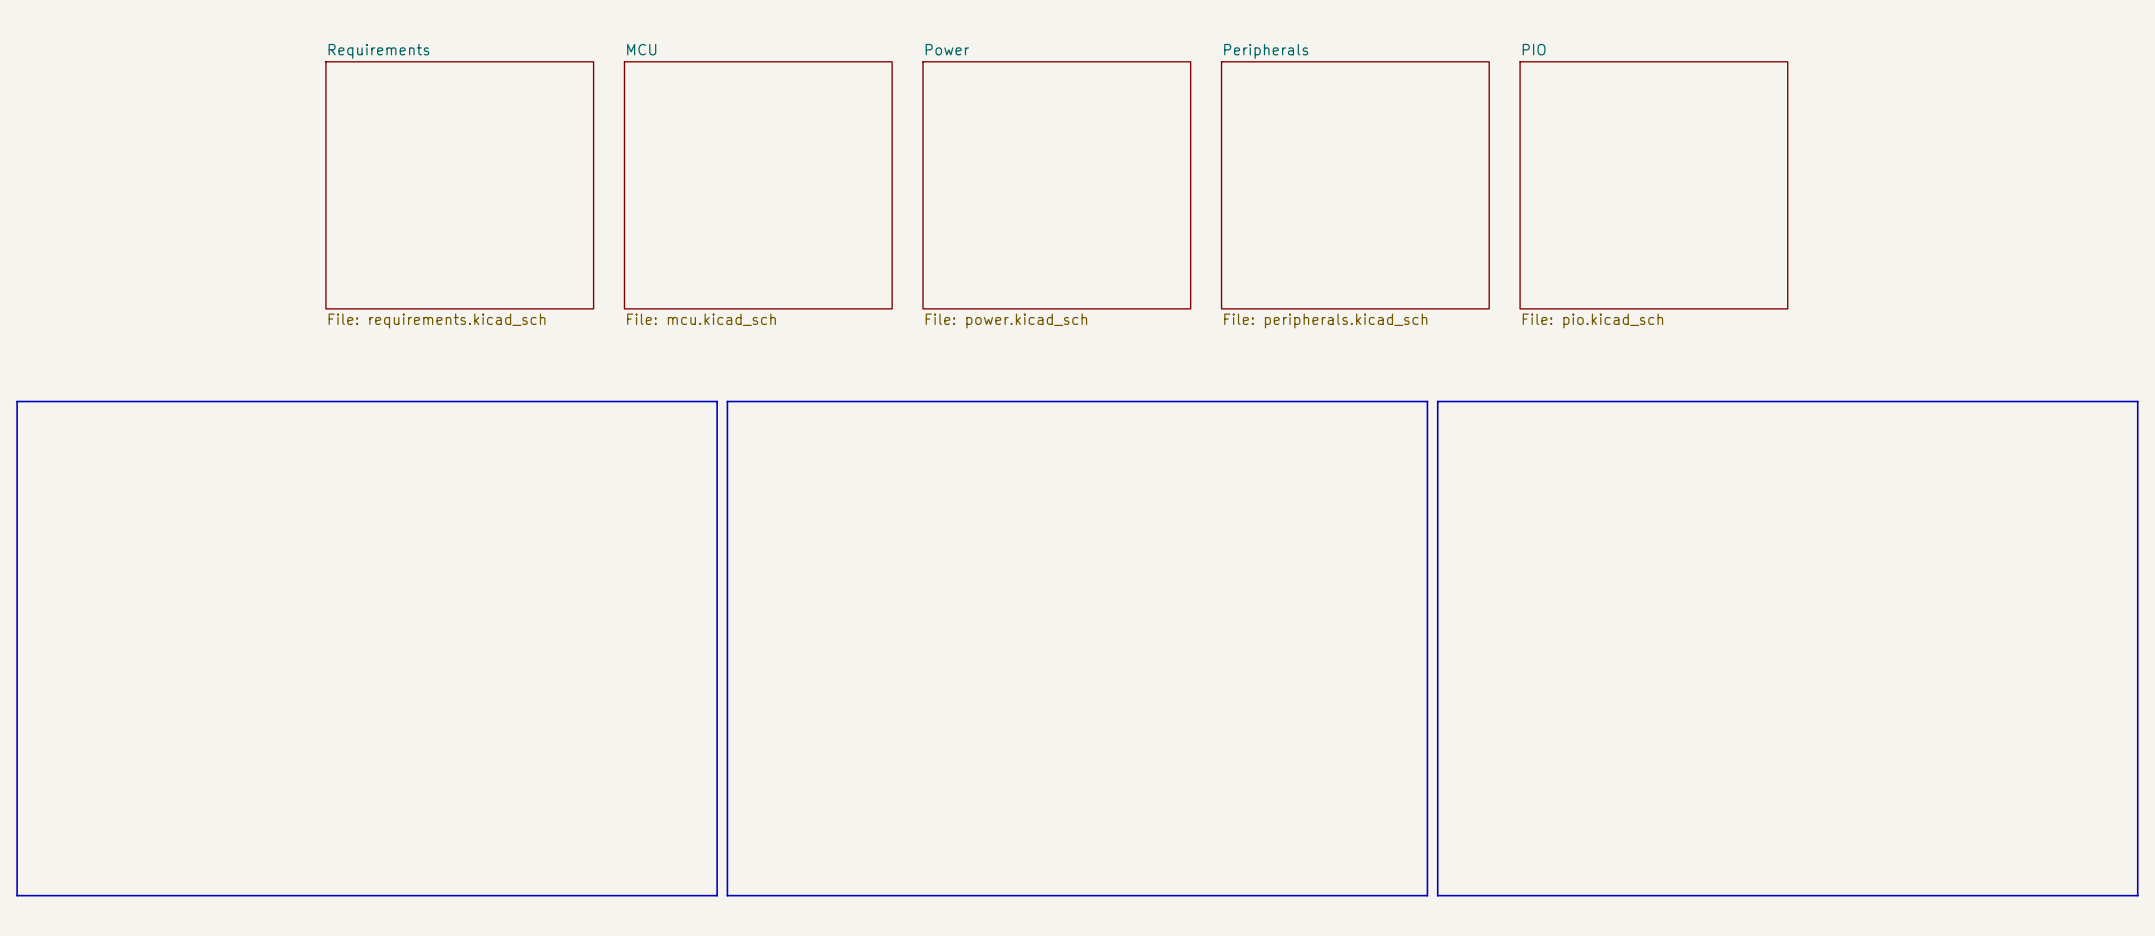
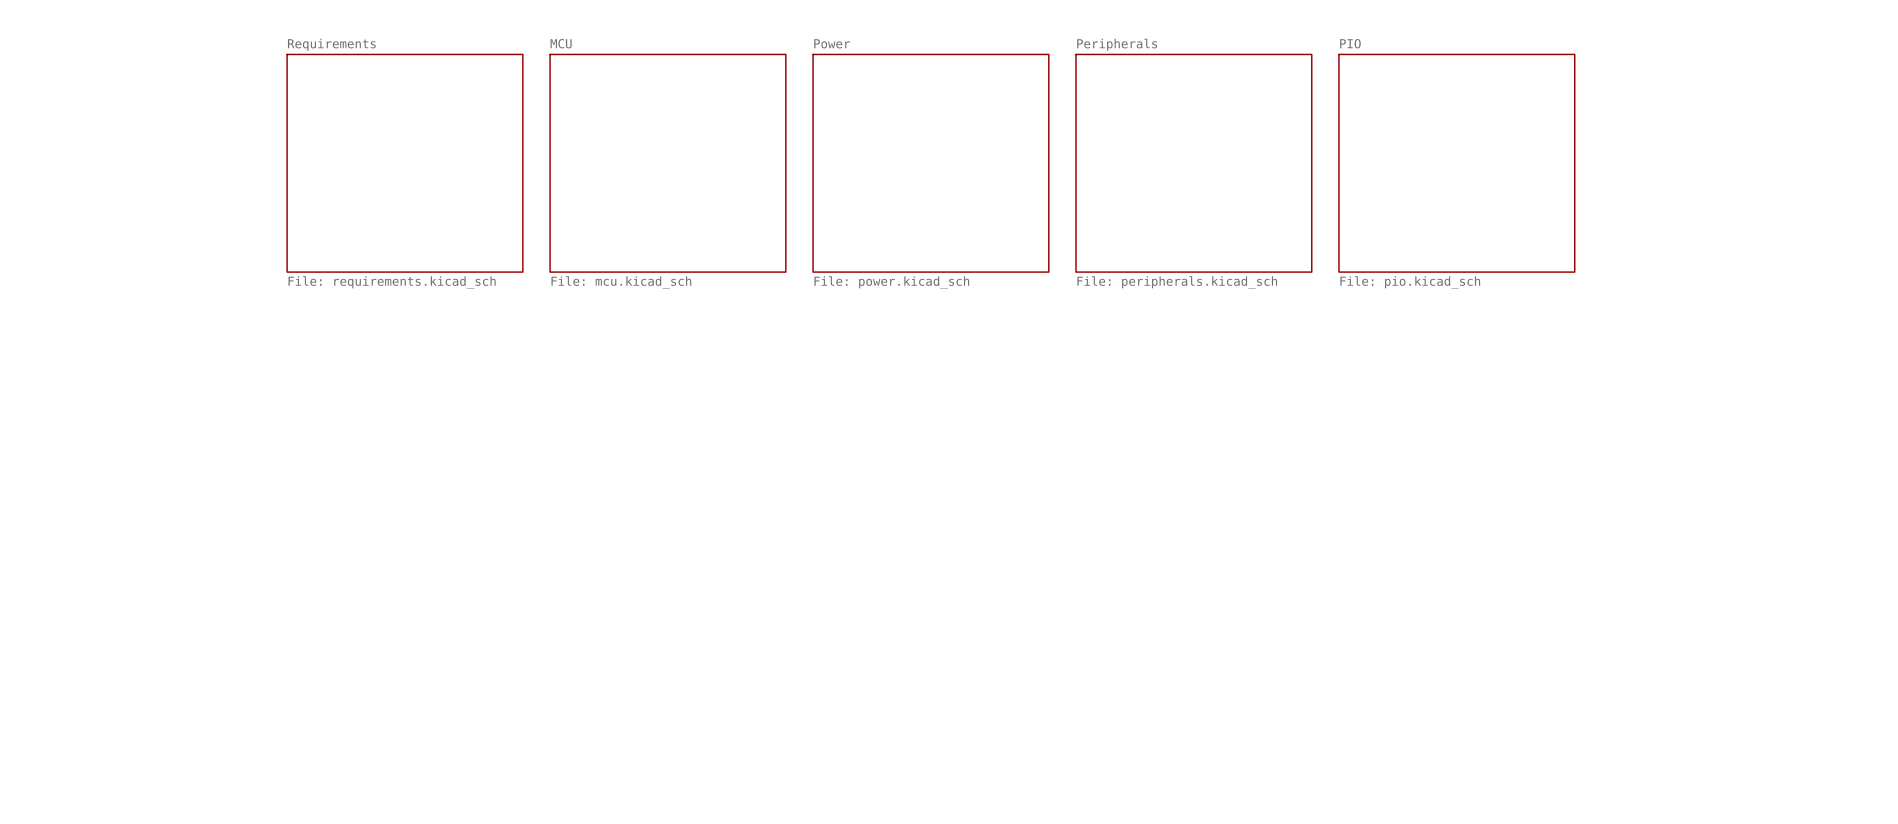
line: (17, 401) (717, 401) (717, 895) (17, 895) (17, 401) -> none
line: (727, 401) (1427, 401) (1427, 895) (727, 895) (727, 401) -> none
line: (1437, 401) (2137, 401) (2137, 895) (1437, 895) (1437, 401) -> none

